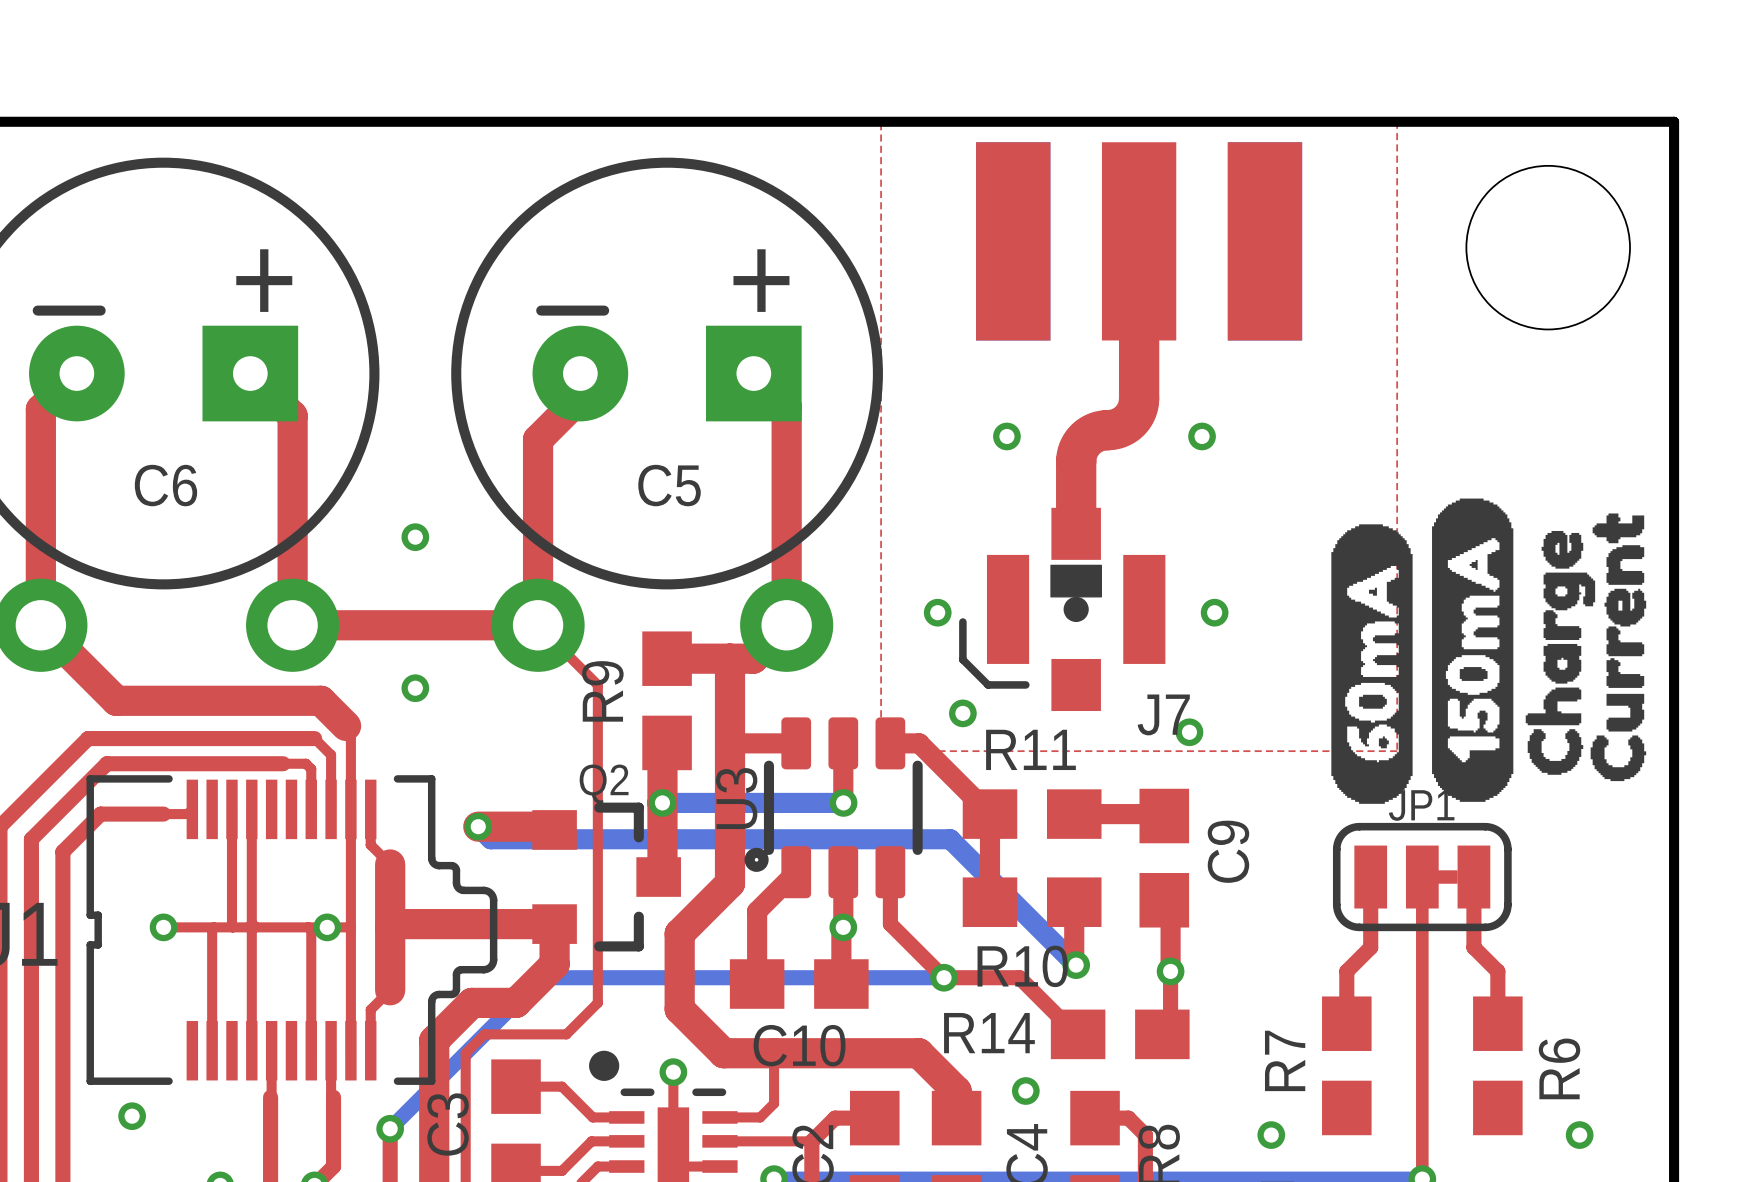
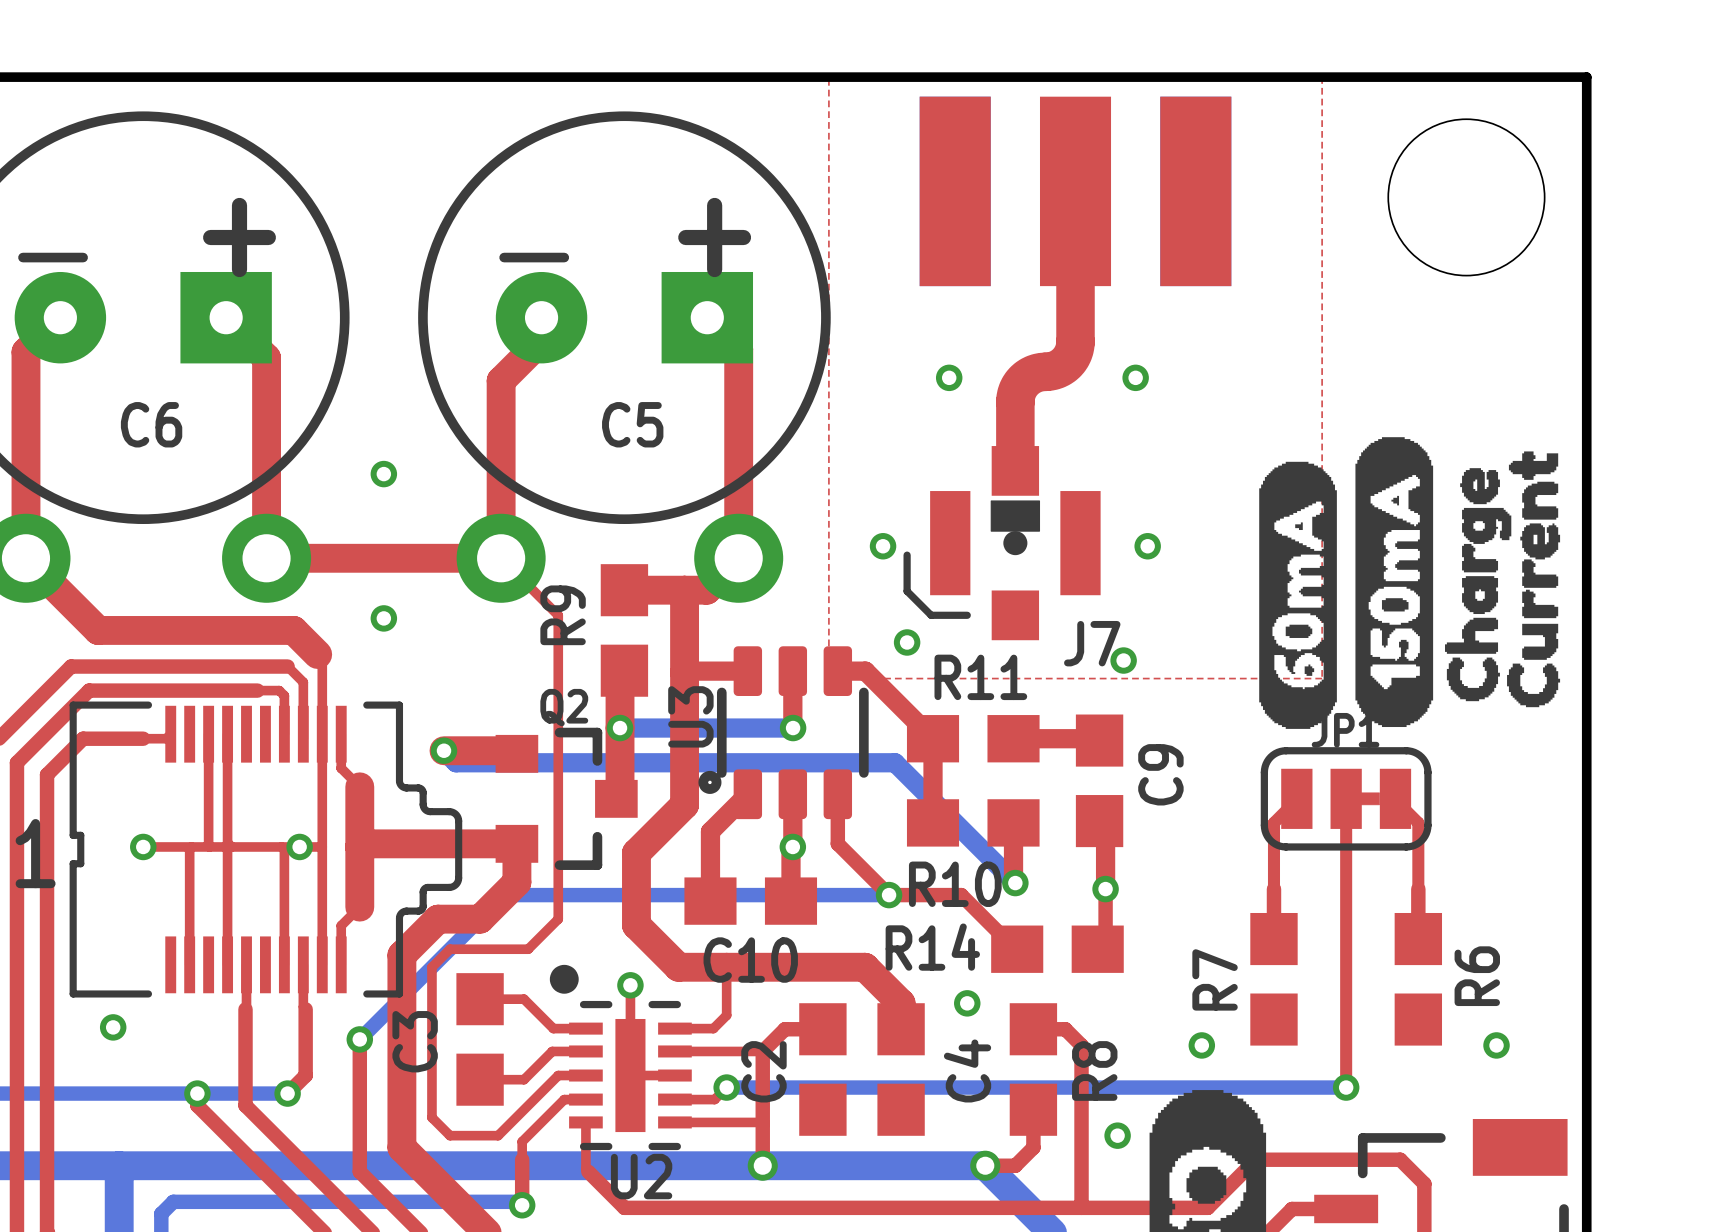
top track: (1370, 877) (1370, 947) (1346, 971) -> (1298, 798) (1273, 822) (1273, 889)
top track: (1473, 877) (1473, 947) (1497, 971) -> (1394, 798) (1418, 822) (1418, 889)

